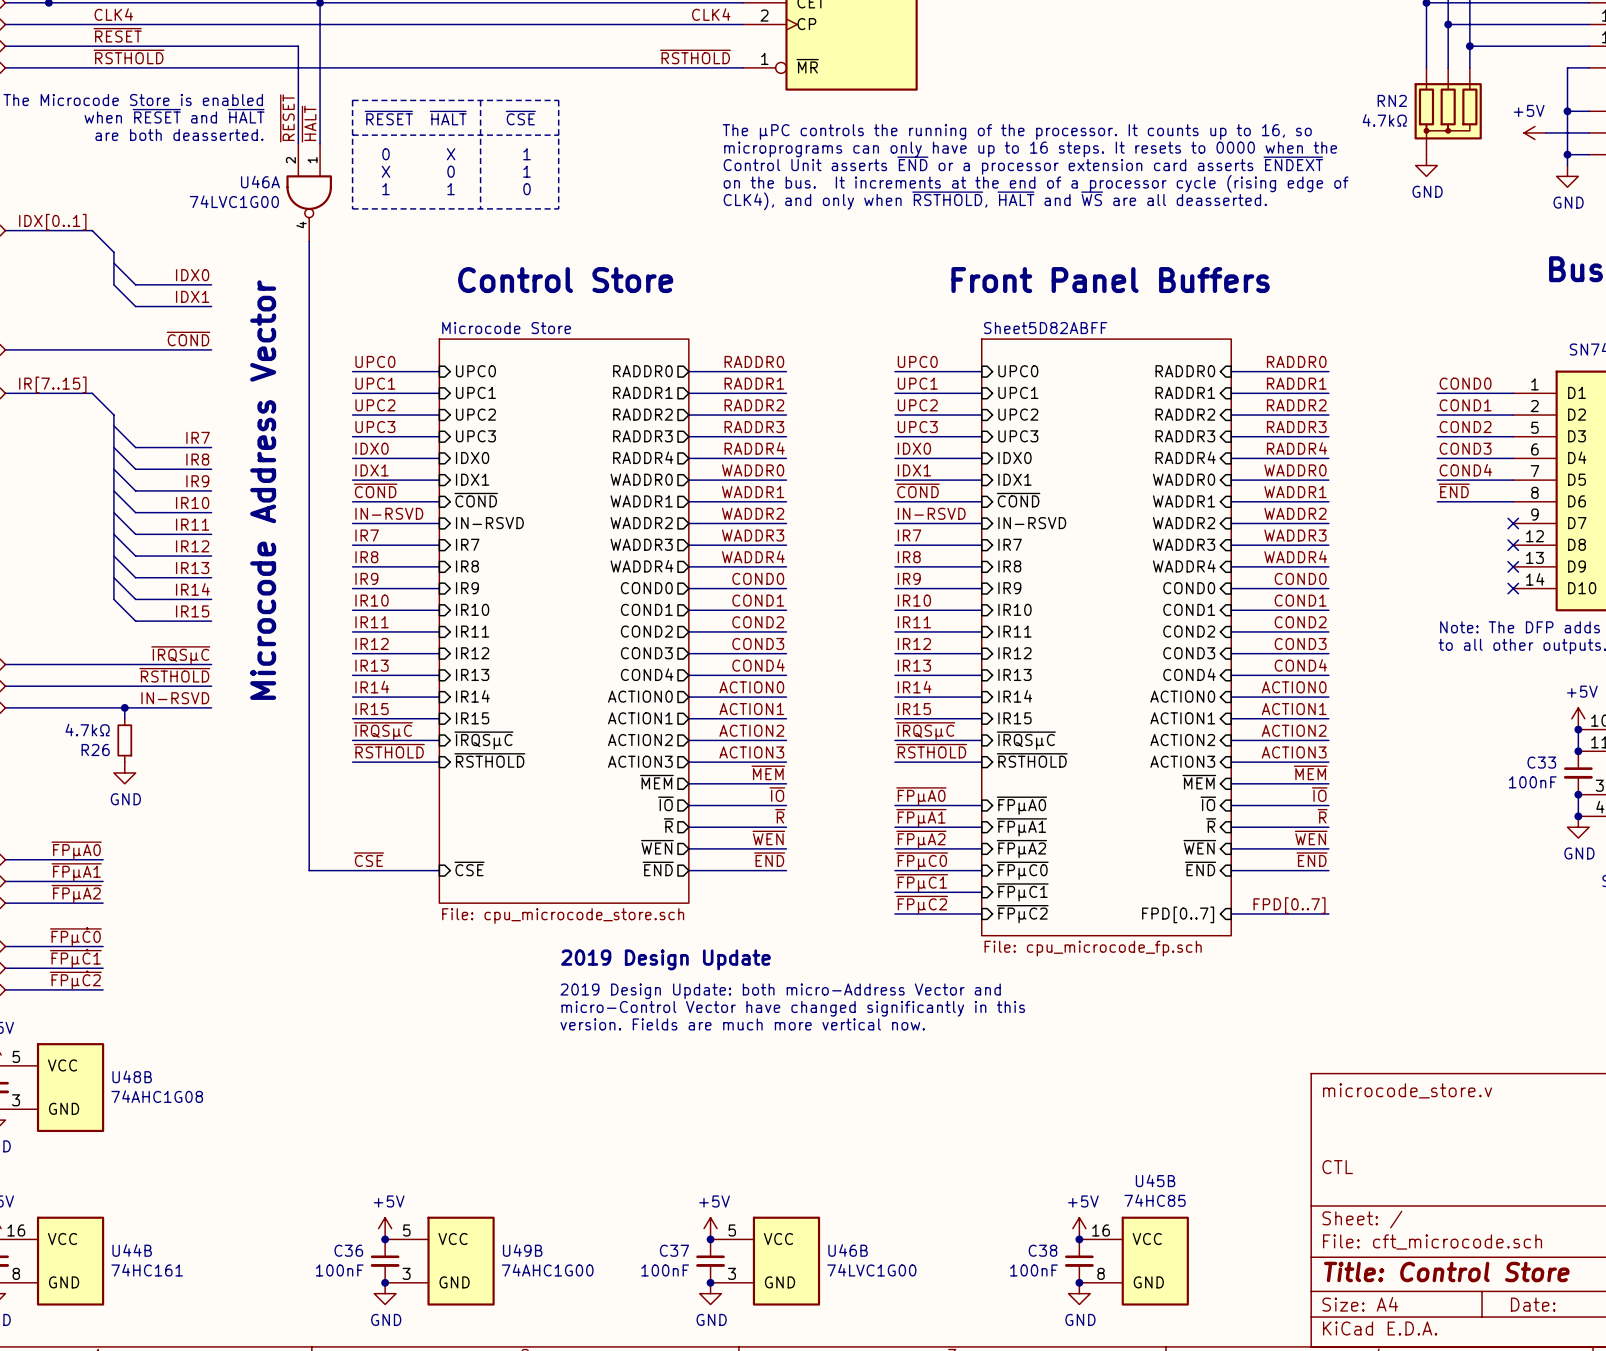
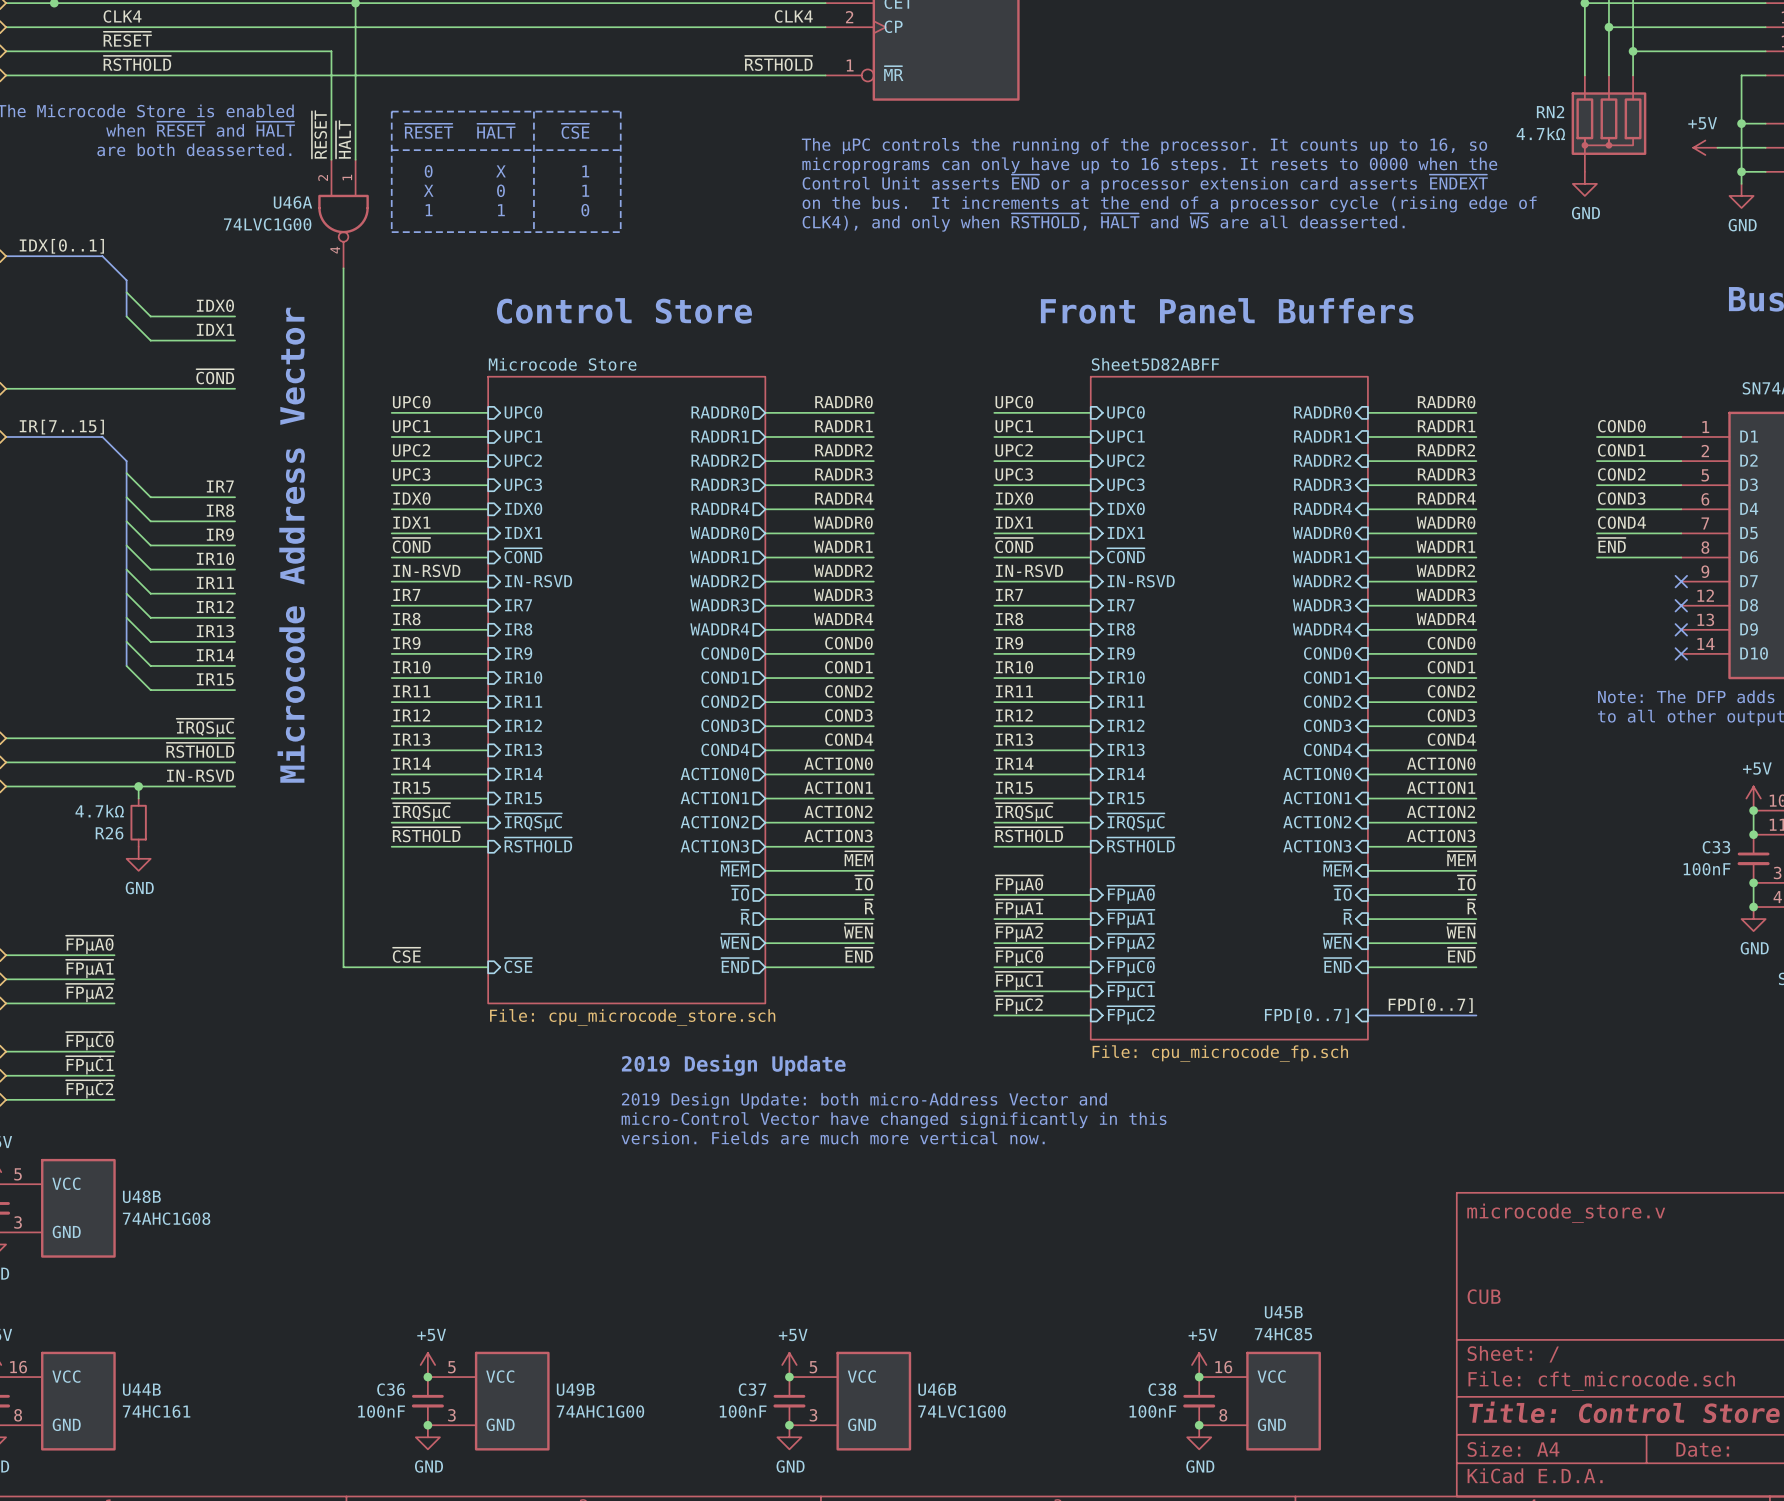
title block: CTL (1337, 1167) -> CUB (1484, 1296)

